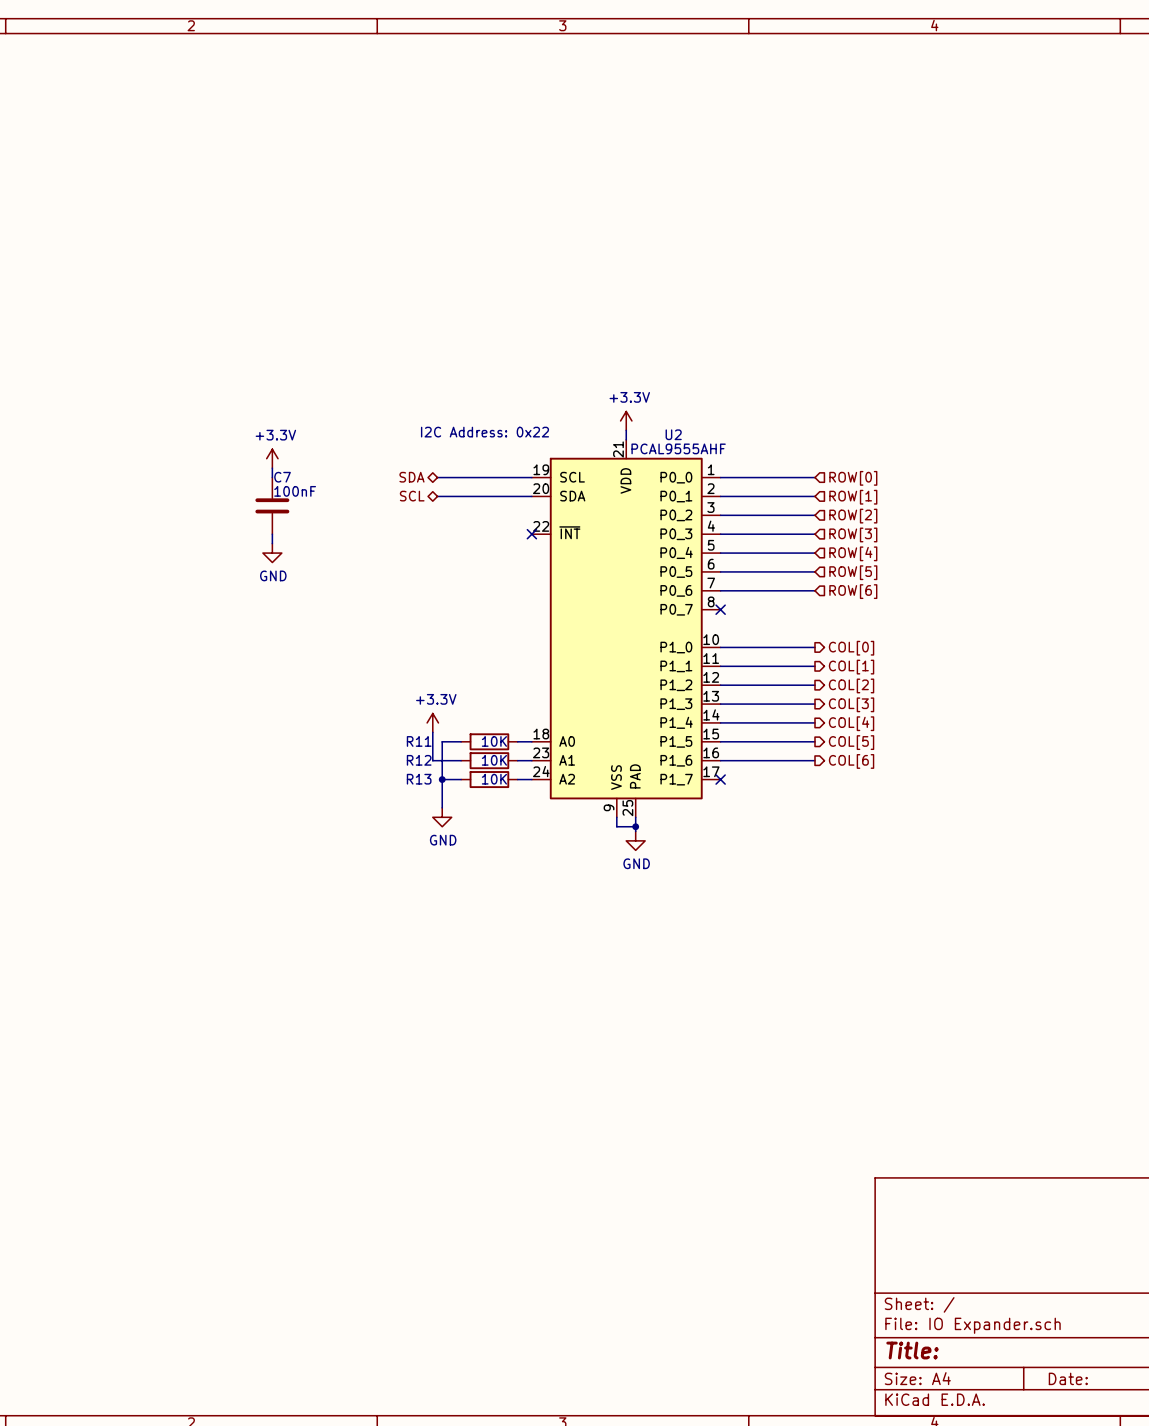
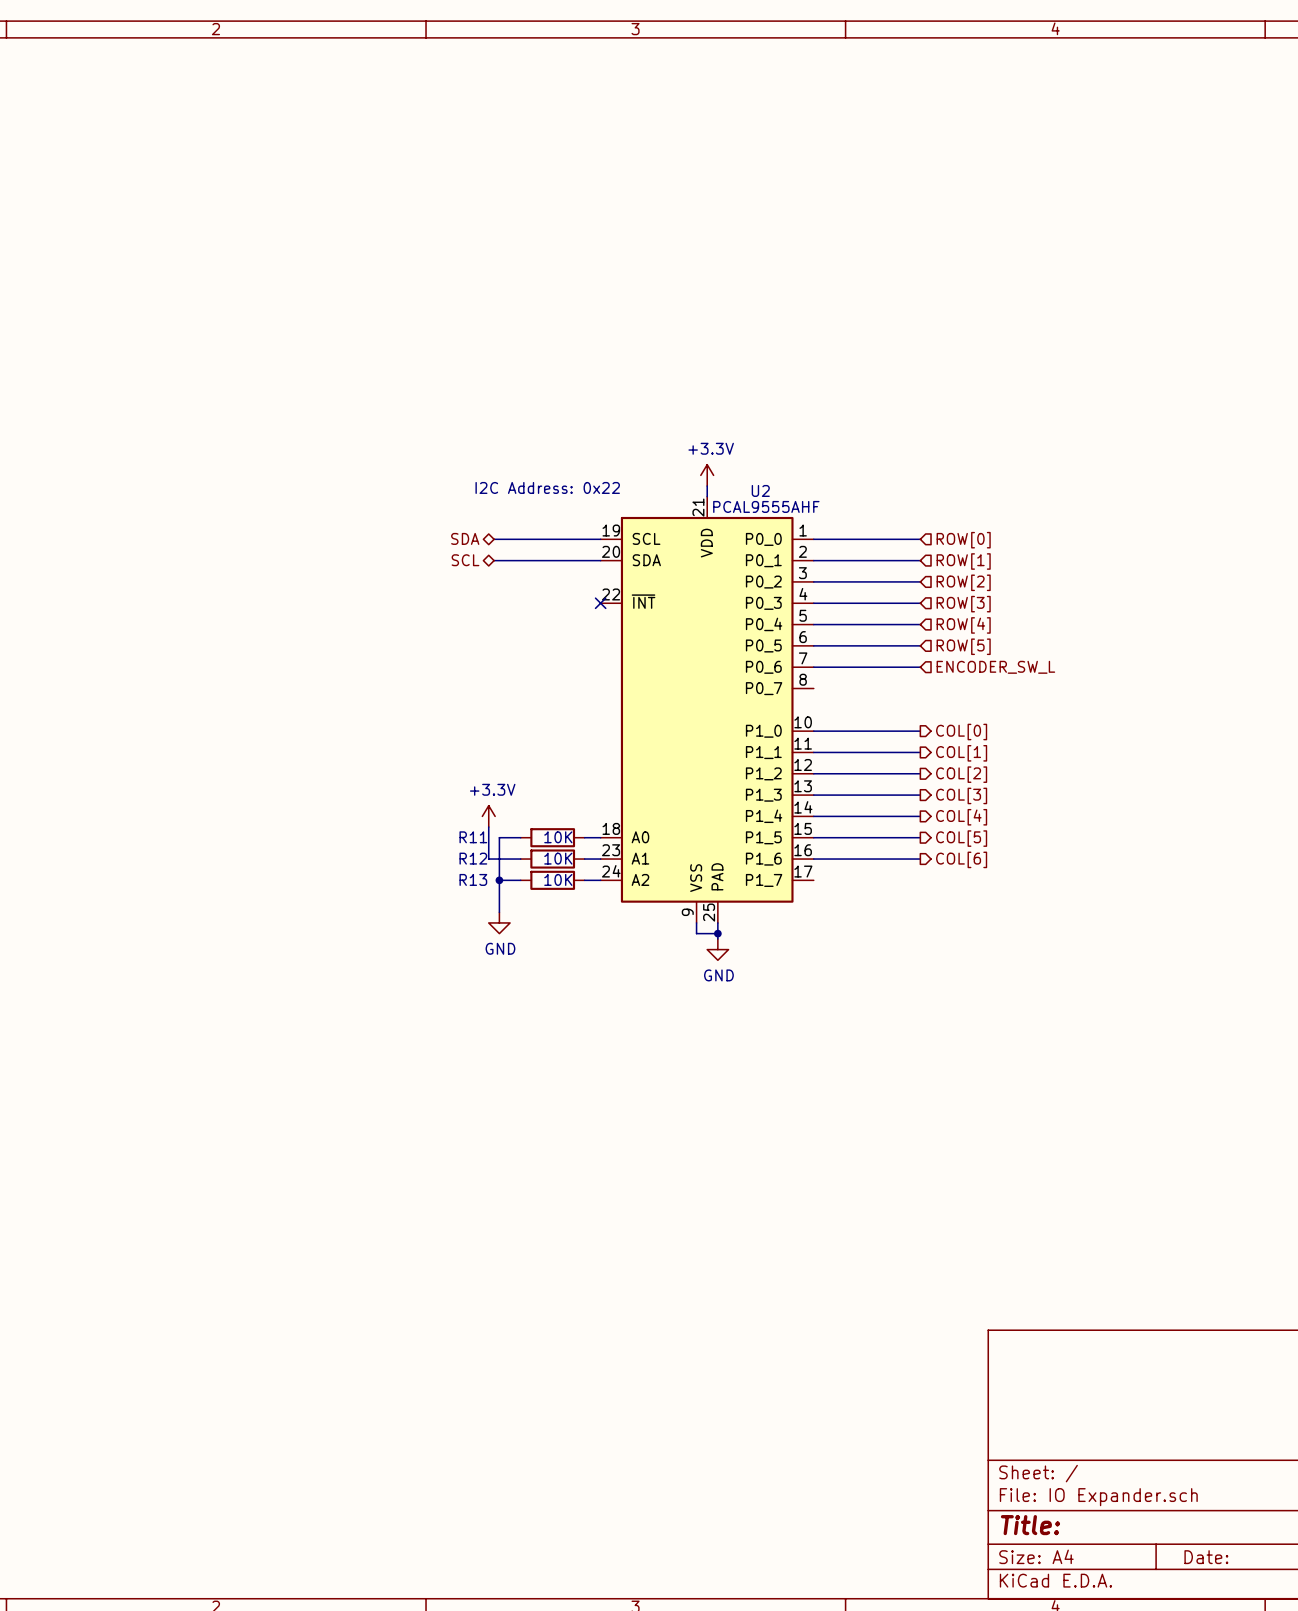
power symbol: +3.3V (272, 458) -> none
wire: (272, 468) (272, 477) -> none
C7: 100nF (272, 505) -> none
wire: (272, 534) (272, 543) -> none
power symbol: GND (272, 553) -> none
hierarchical label: ROW[6] (853, 591) -> ENCODER_SW_L (995, 667)
no-connect mark: (720, 609) -> none
no-connect mark: (720, 779) -> none

